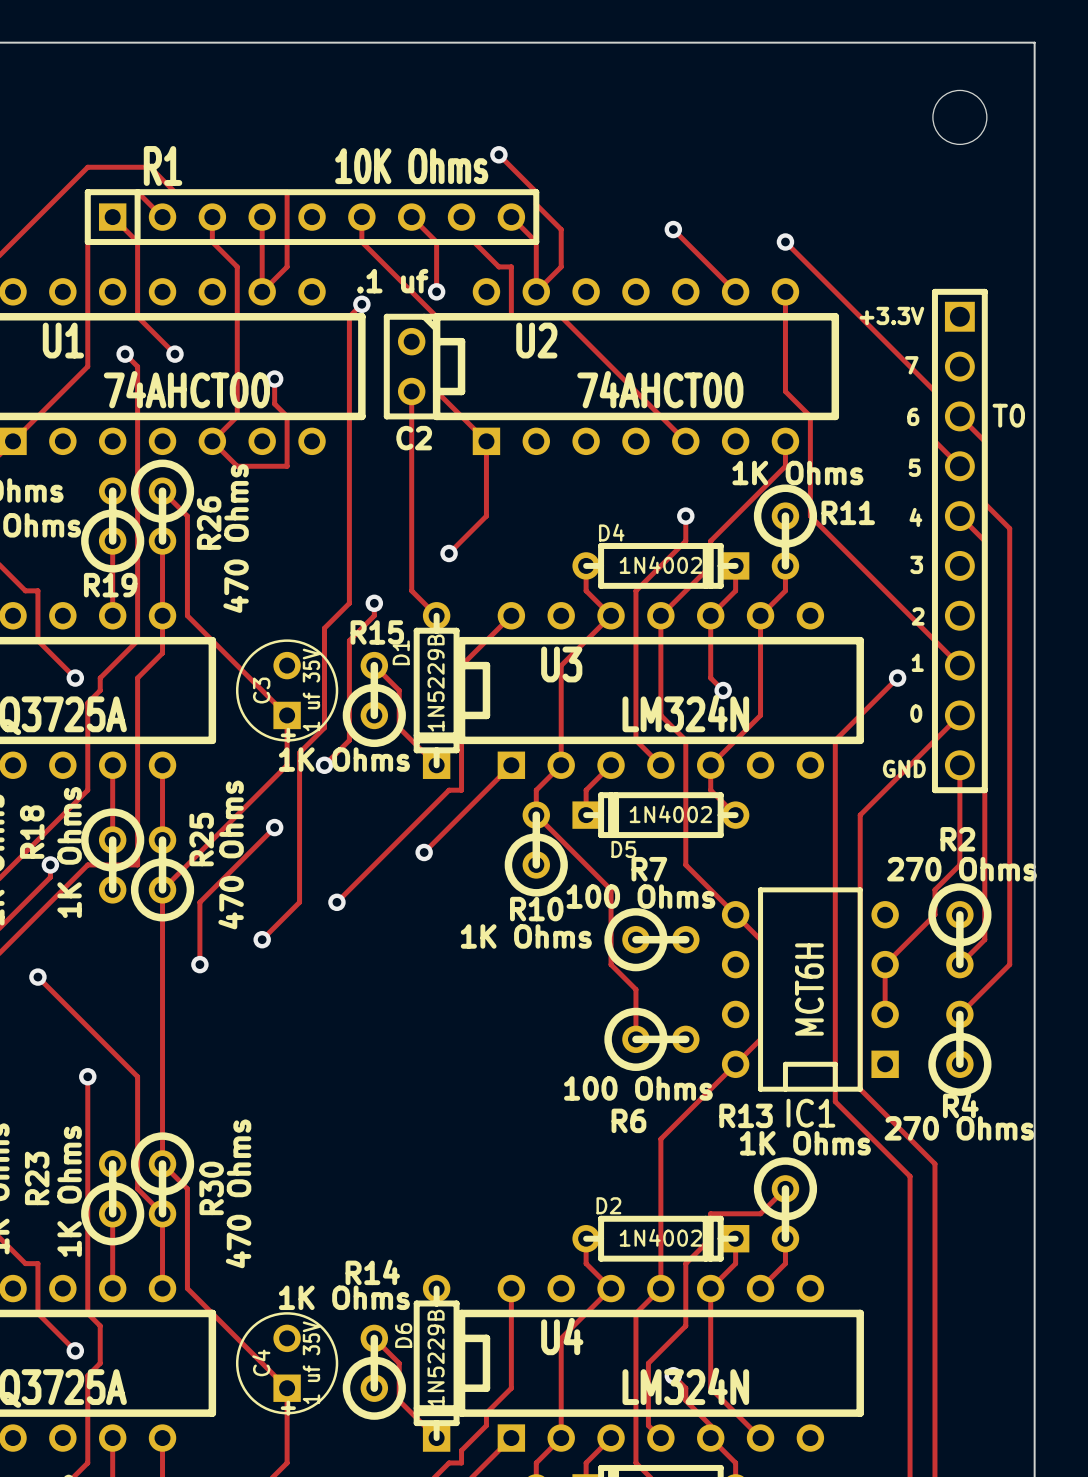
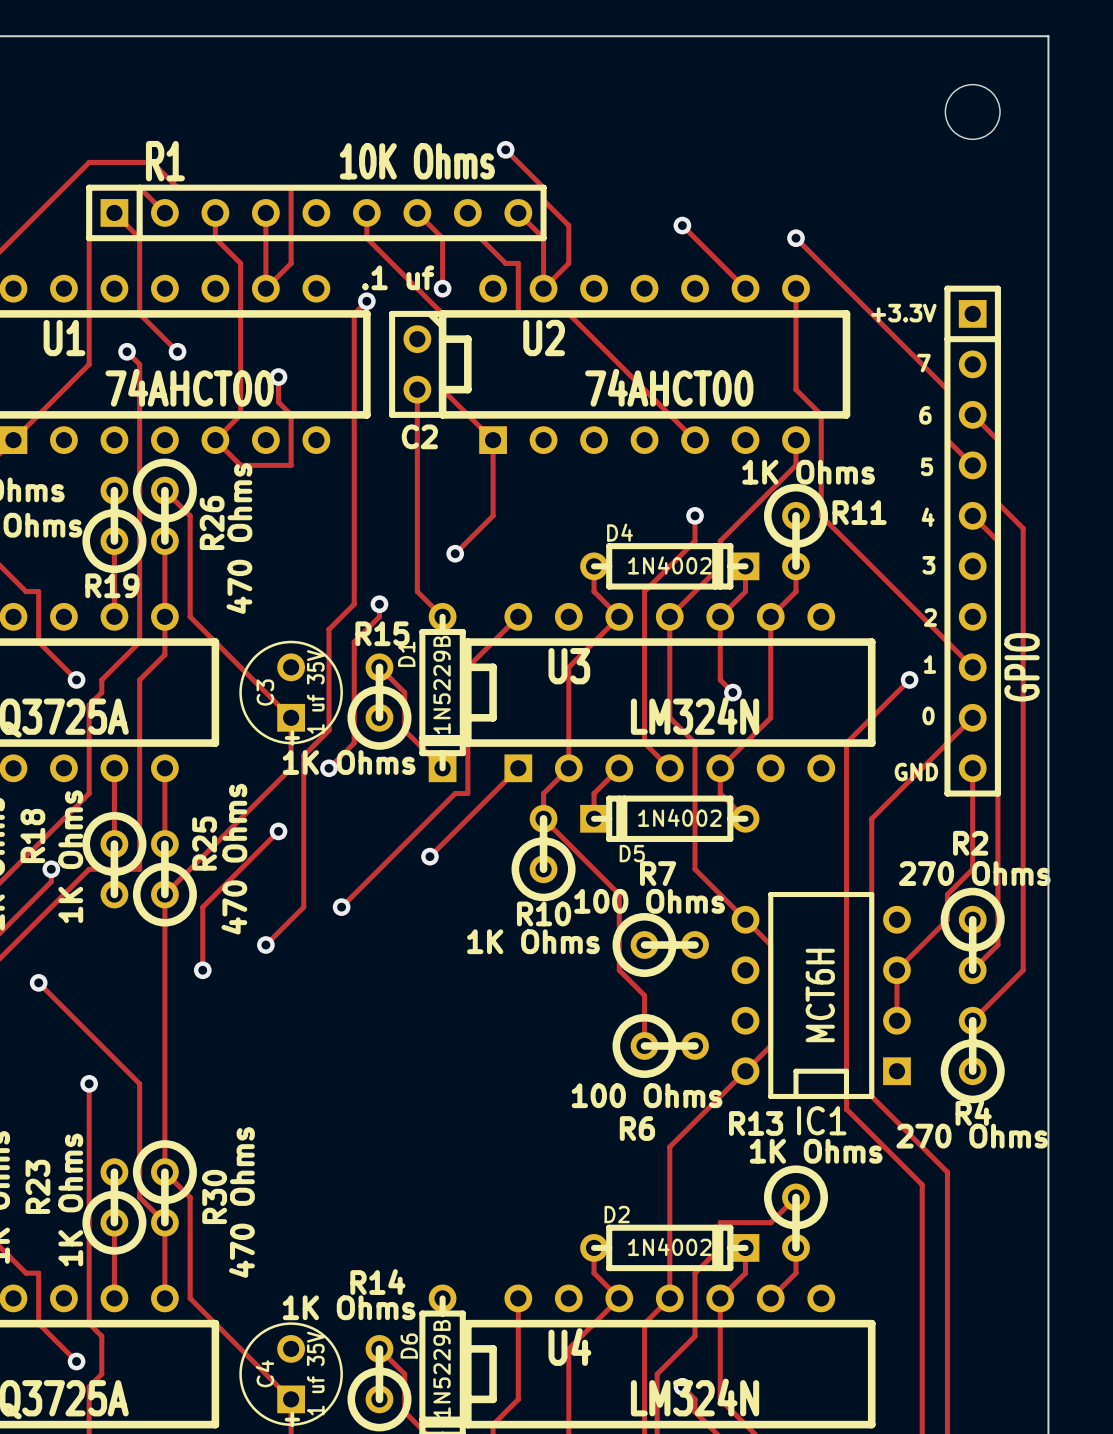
T0: (959, 541) -> none
part: none -> GPIO (972, 541)

